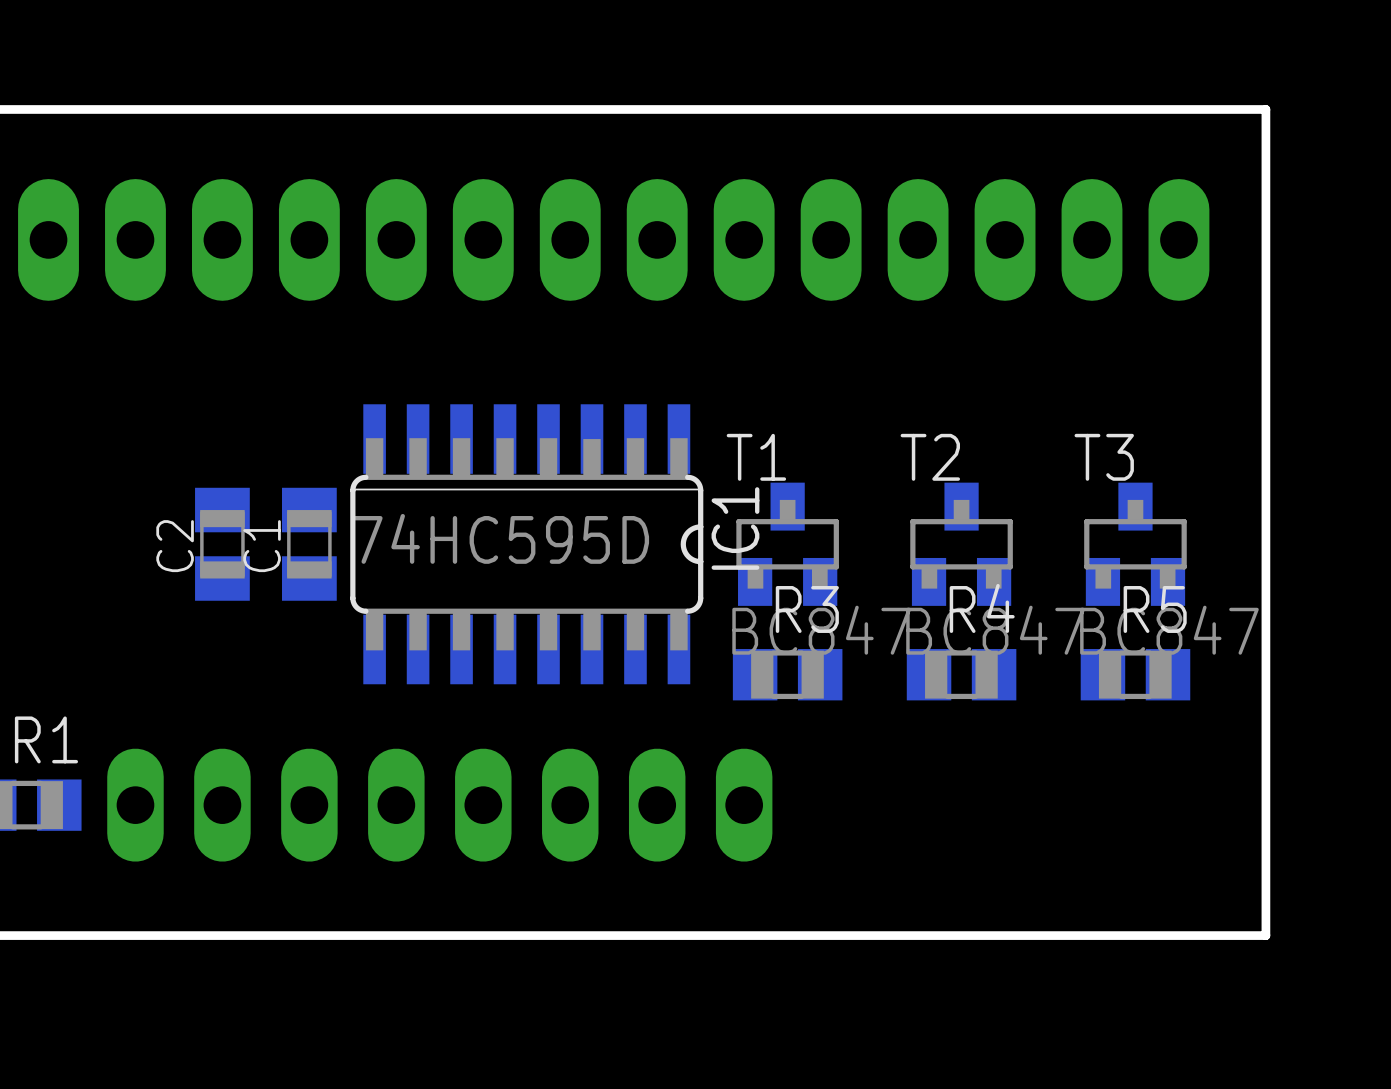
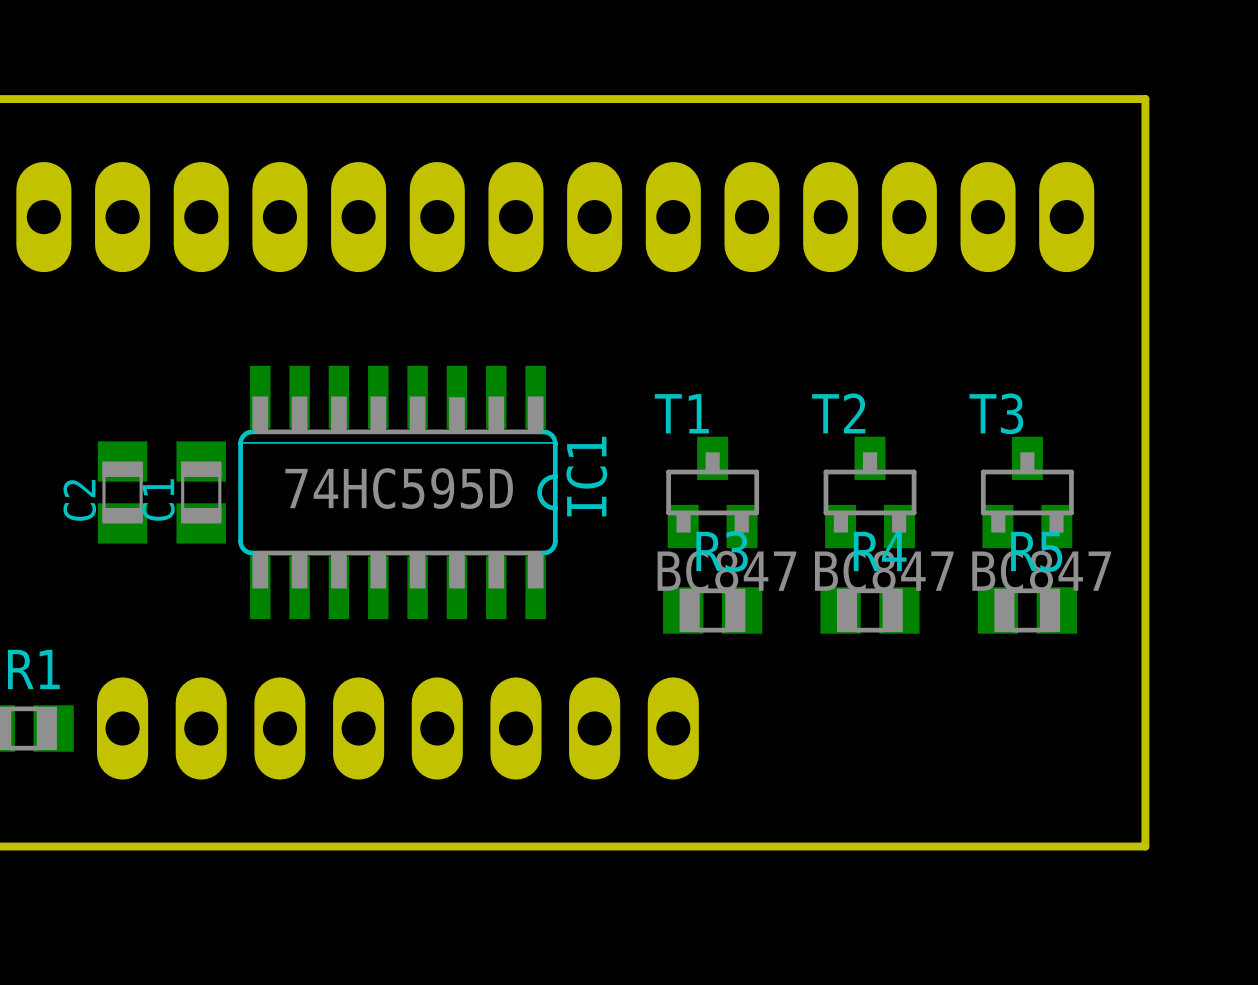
C2: none -> (122, 492)
C1: (309, 544) -> none
IC1 position: (526, 544) -> (397, 492)
C2 name: C2 (175, 546) -> C1 (158, 500)

